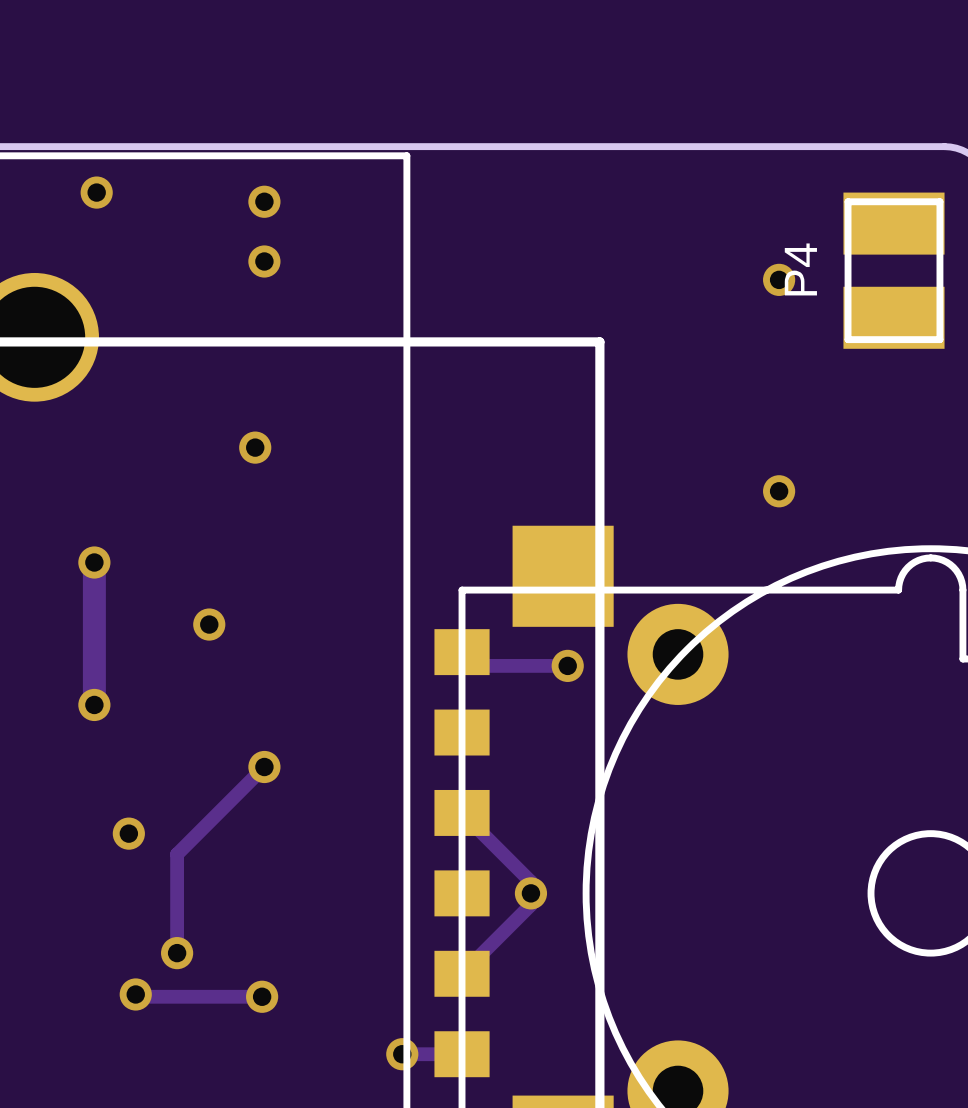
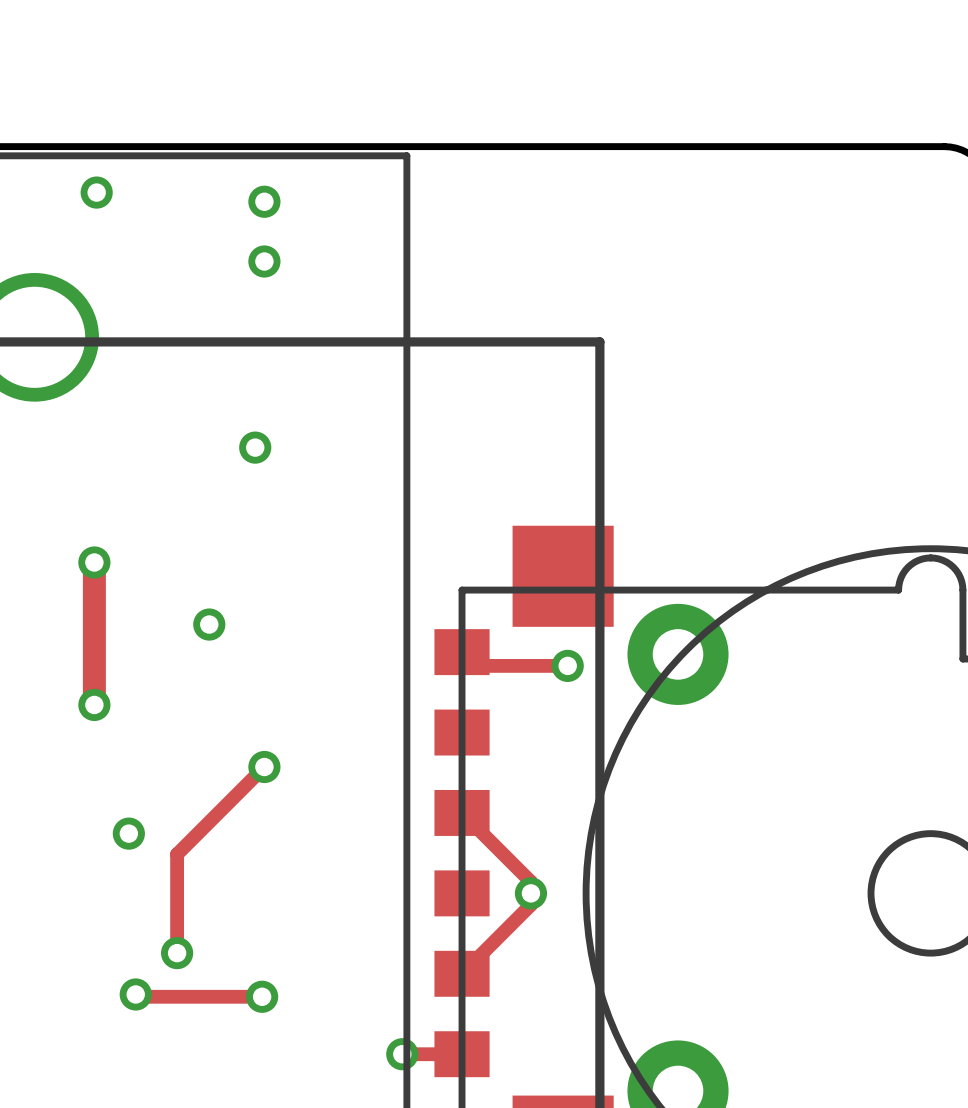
P4: (893, 270) -> none
via: (779, 279) -> none
via: (779, 491) -> none

